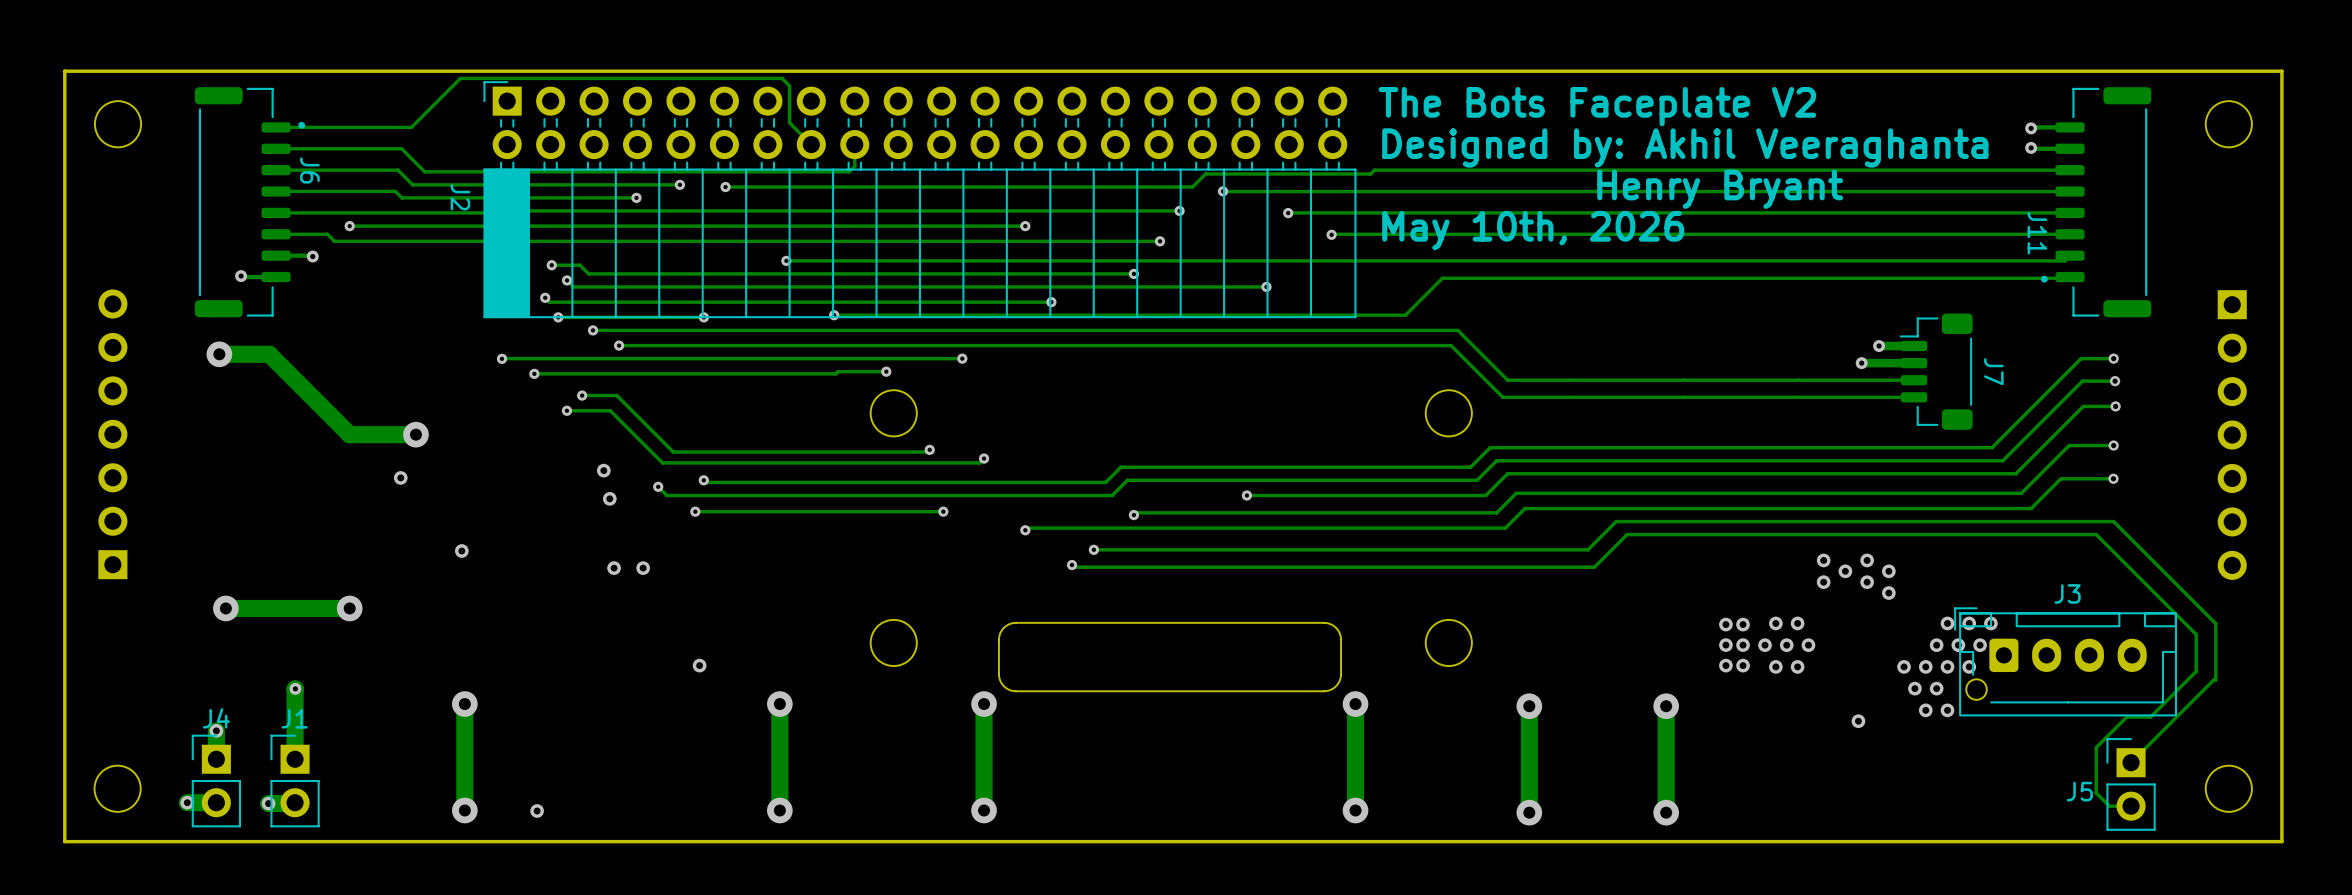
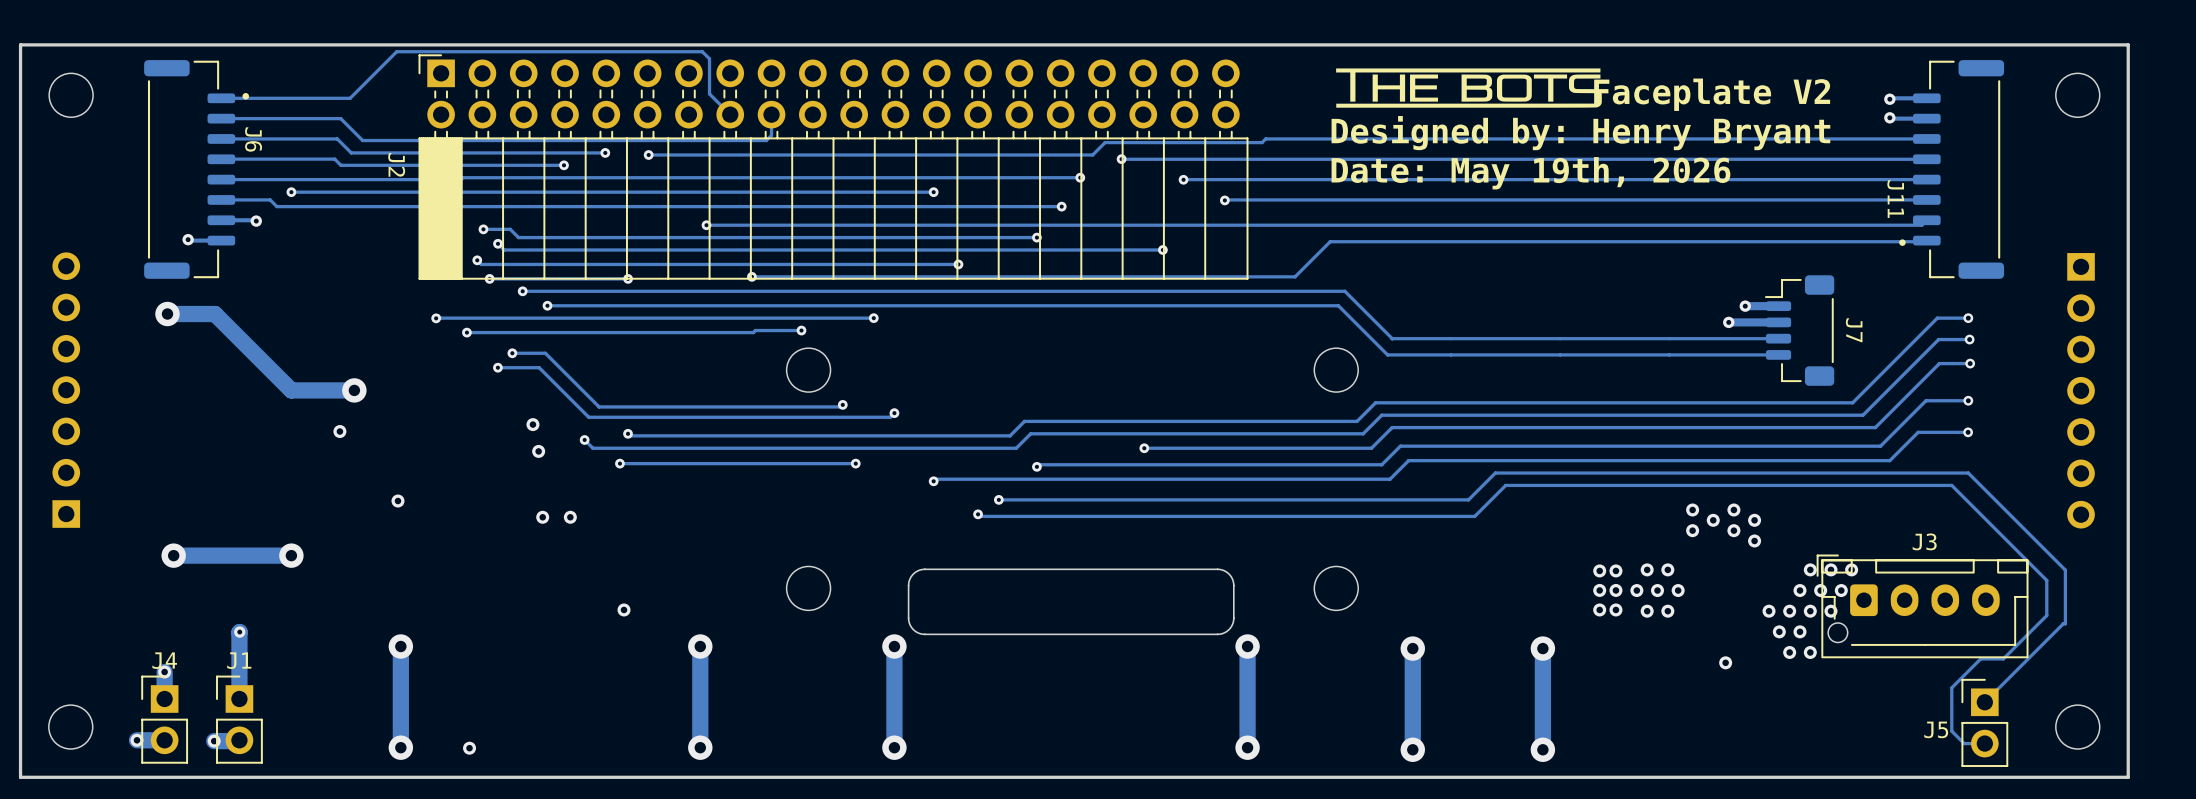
drawing: none -> [1336, 68, 1602, 108]
text: The Bots Faceplate V2 (1597, 106) -> Faceplate V2 (1712, 94)
text: Designed by: Akhil Veeraghanta (1685, 147) -> Designed by: Henry Bryant (1580, 133)
text: Henry Bryant (1720, 189) -> none
text: May 10th, 2026 (1533, 230) -> Date: May 19th, 2026 (1530, 173)

